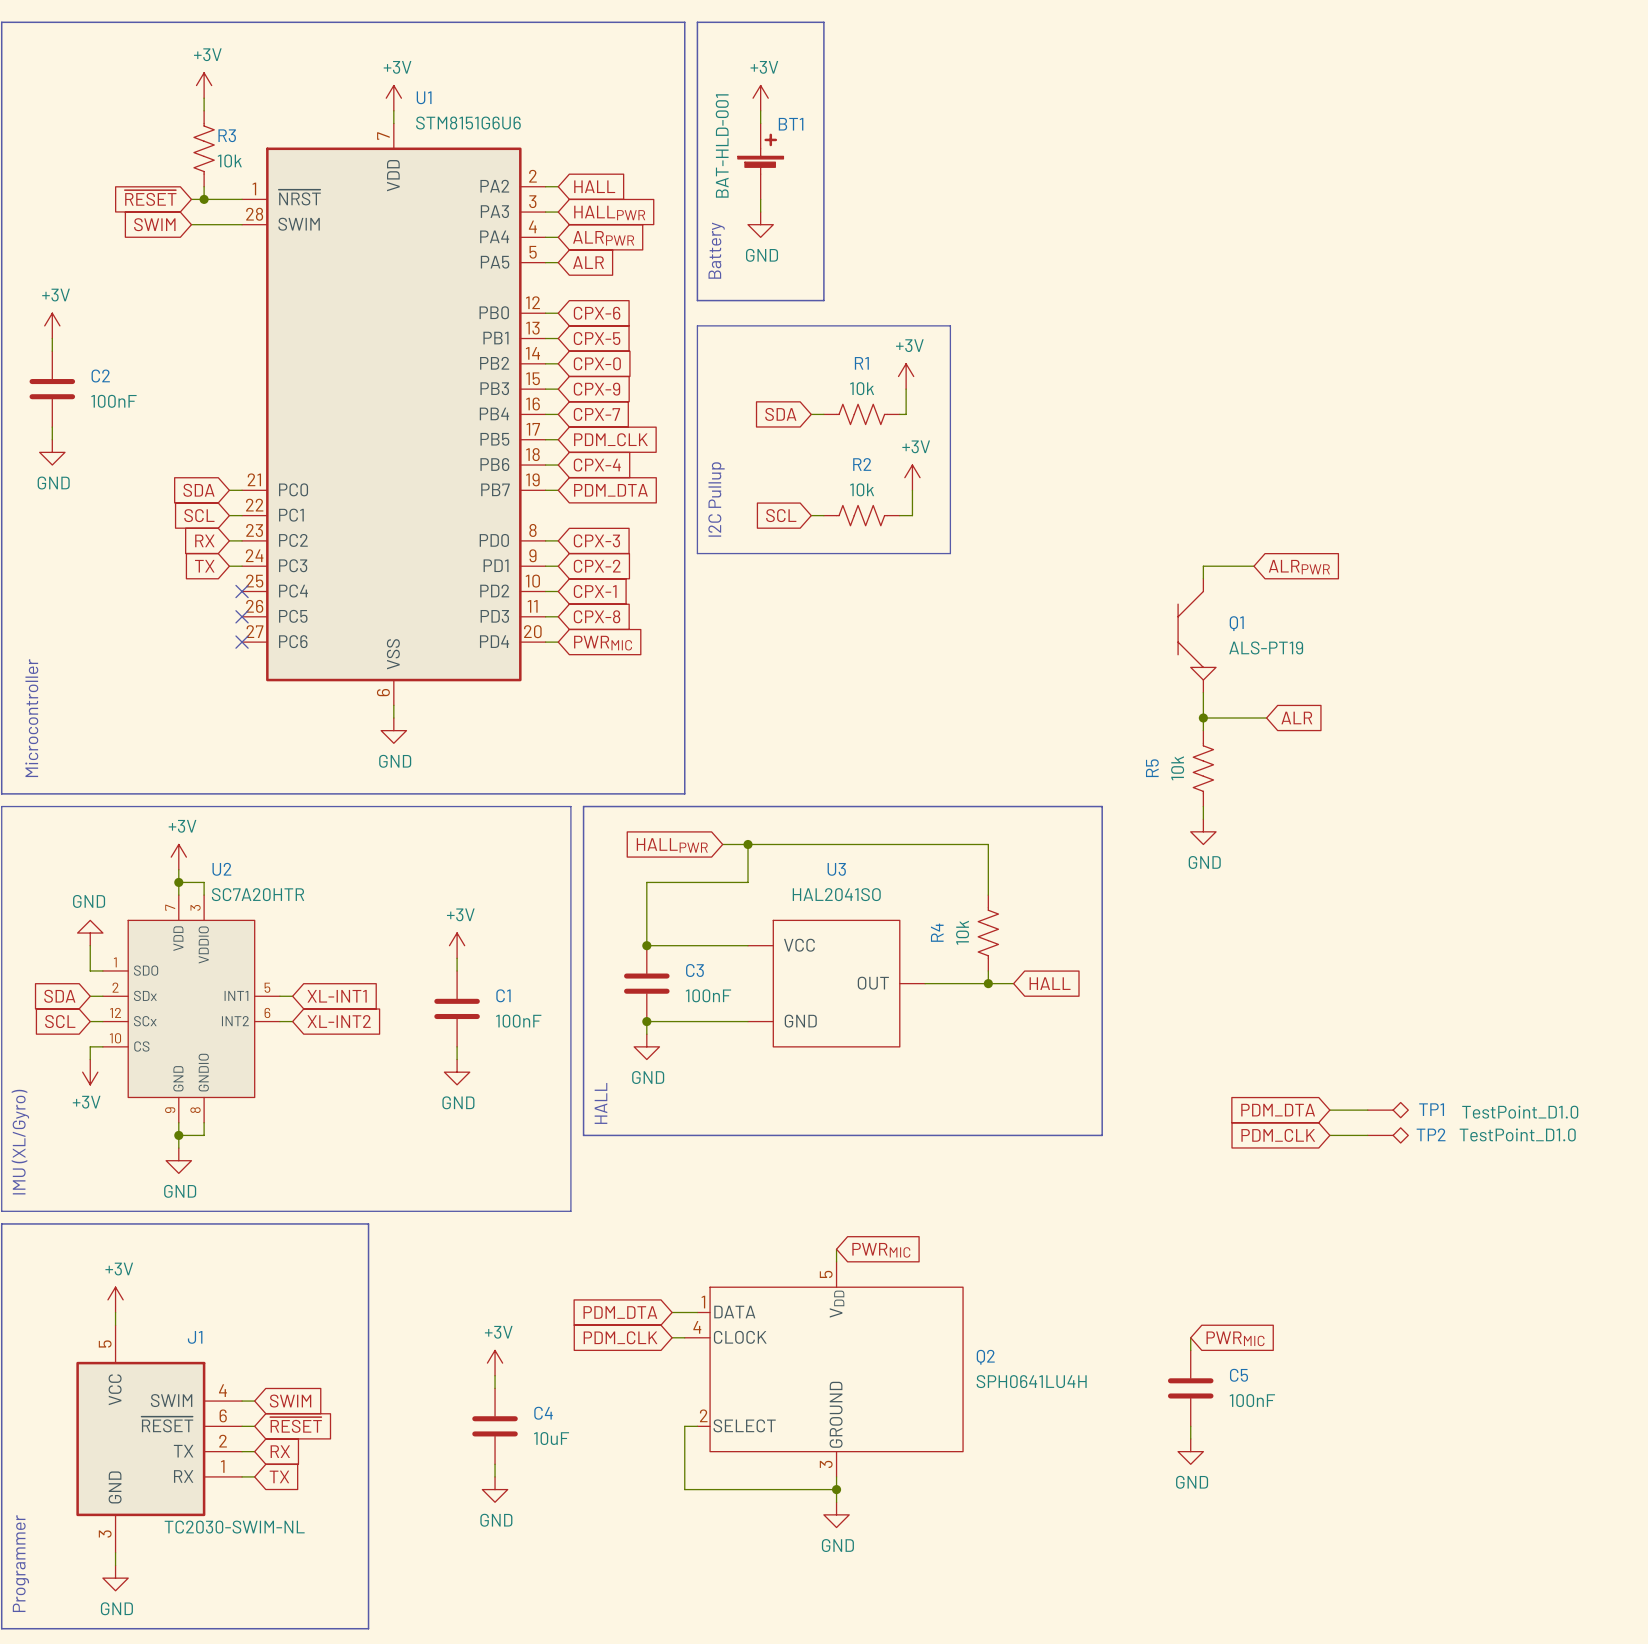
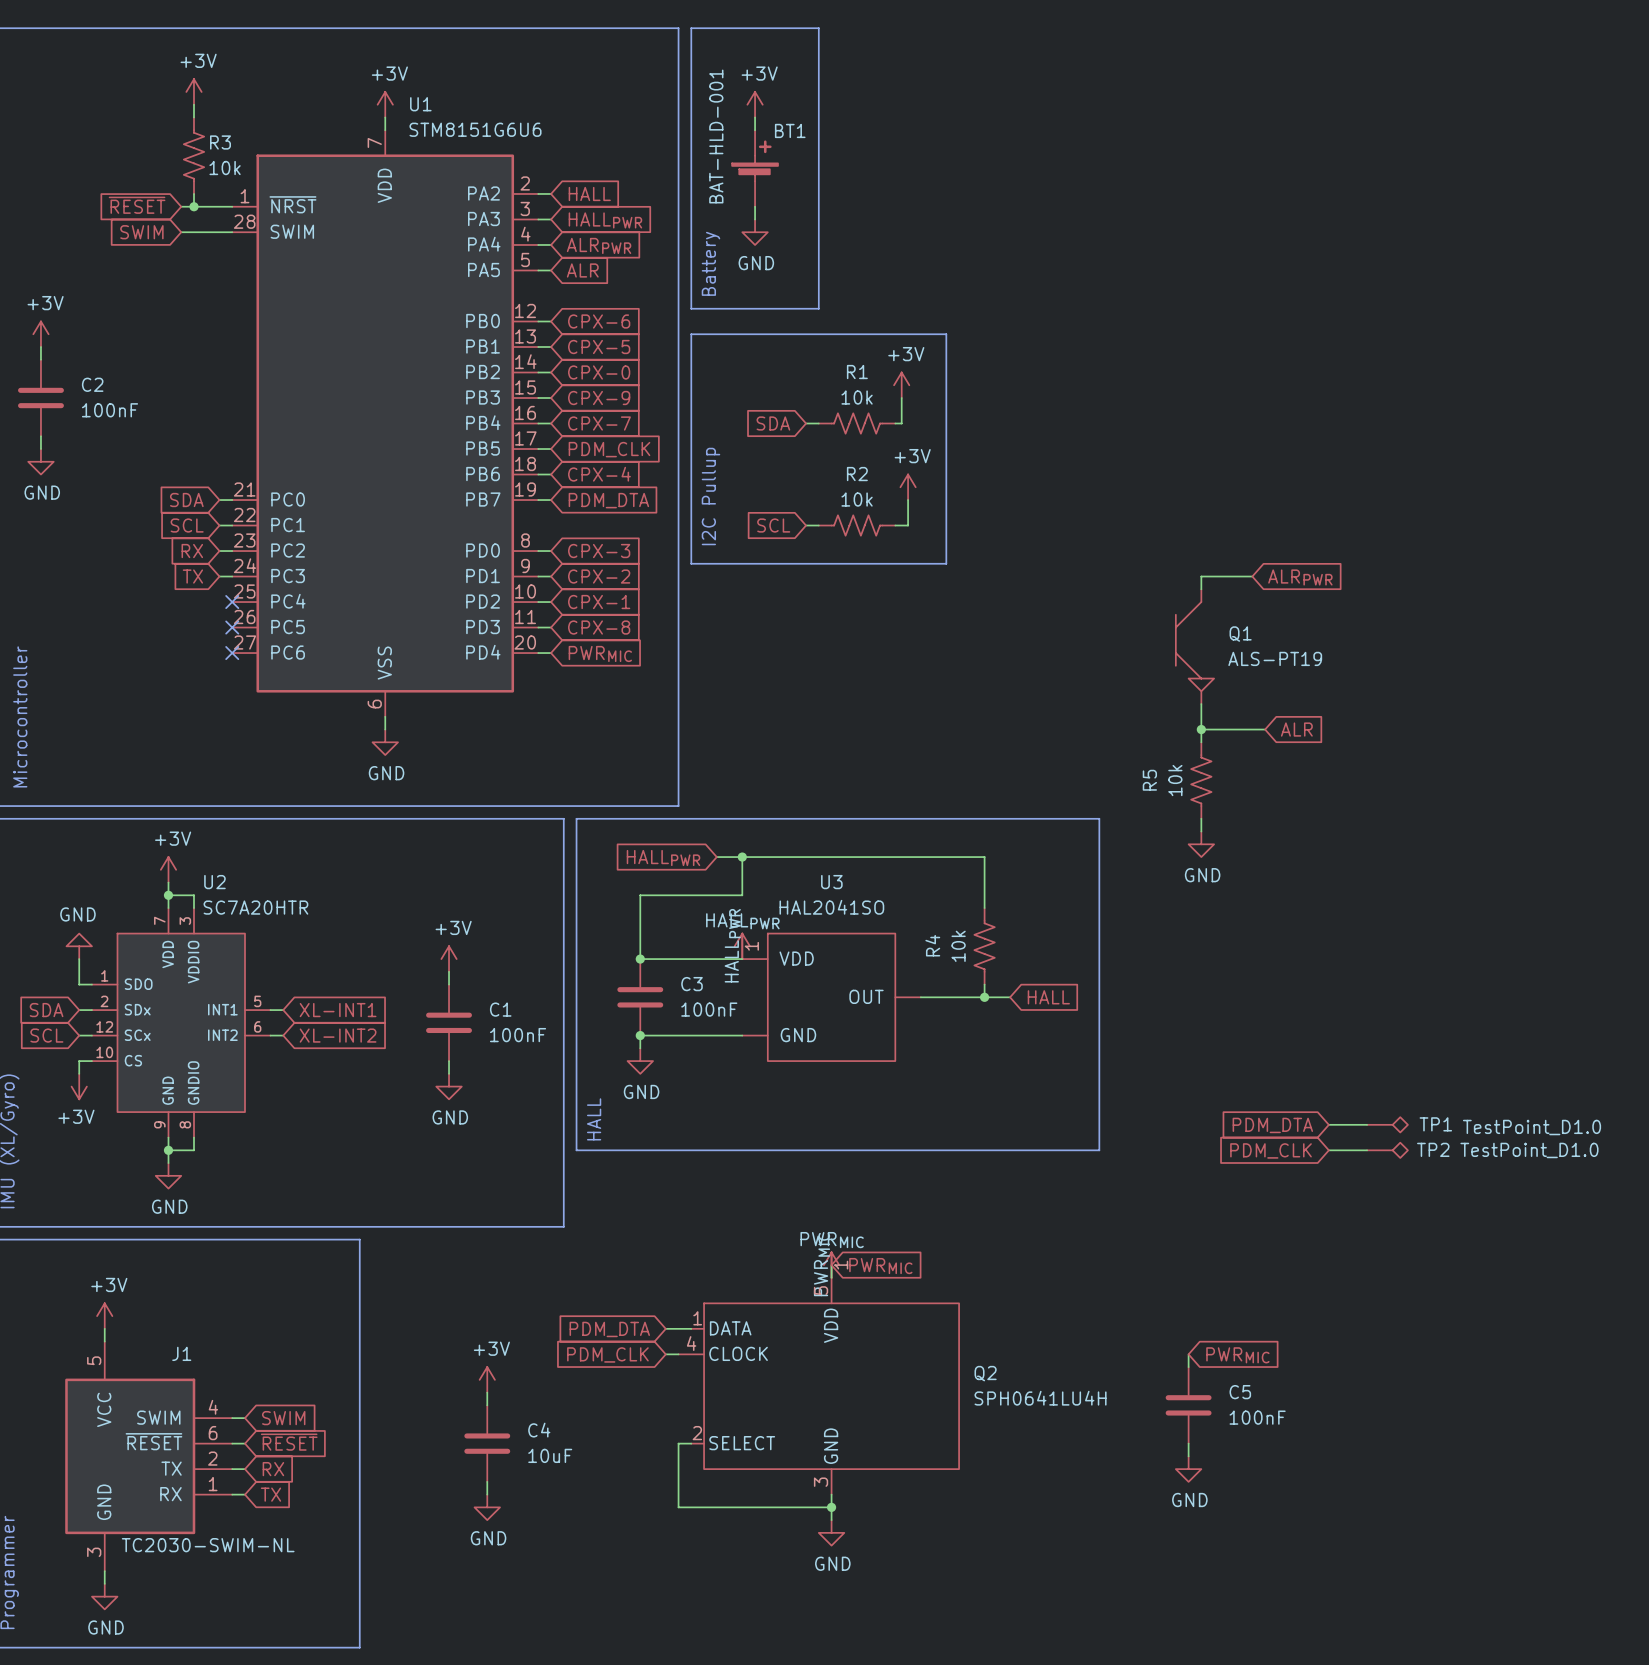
power symbol: none -> HALLPWR (742, 946)
U3 pin name: VCC (799, 945) -> VDD (796, 958)
power symbol: none -> PWRMIC (831, 1265)
Q2 symbol: [684, 1261, 964, 1477] -> [678, 1277, 960, 1495]

